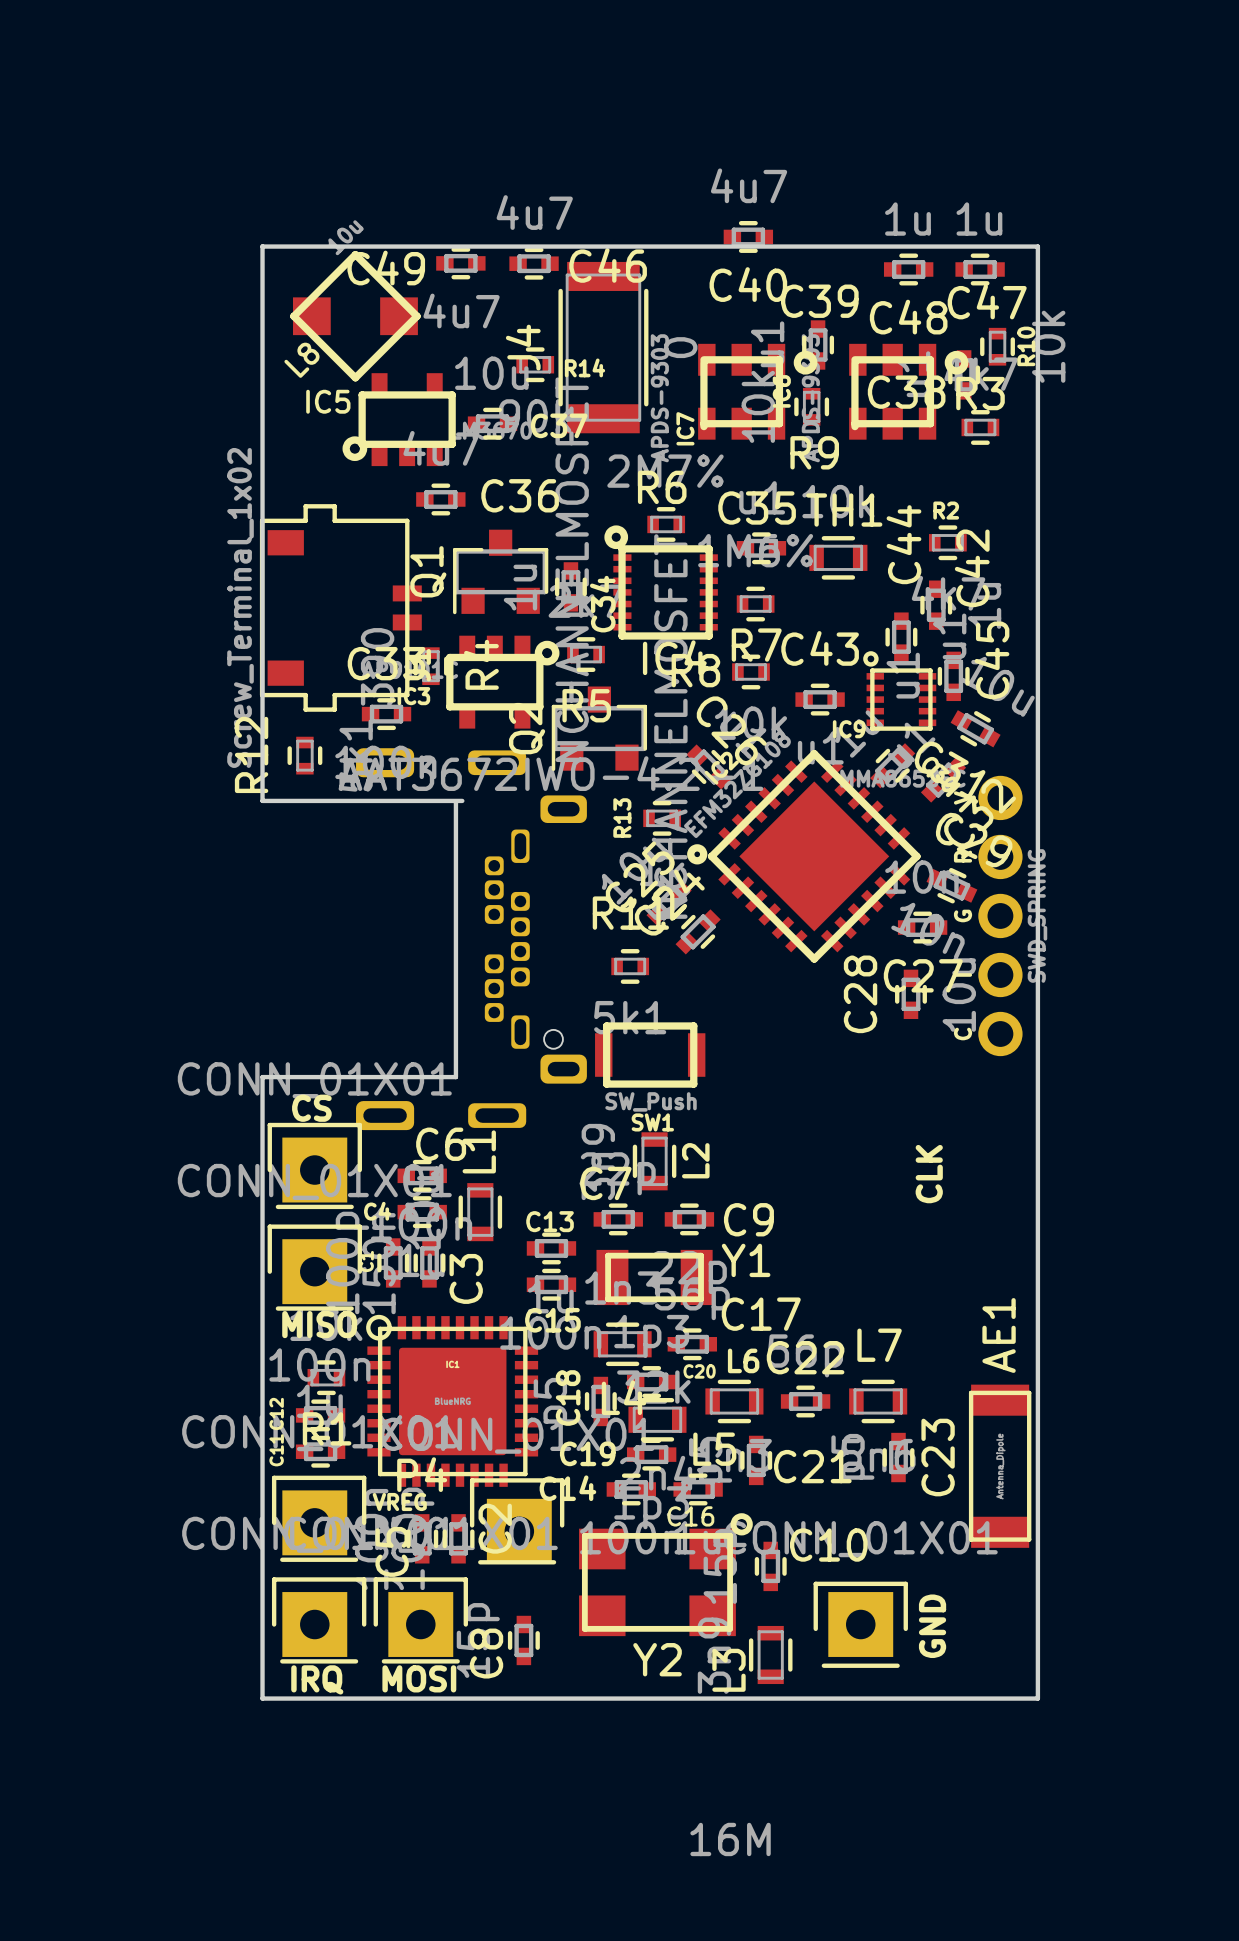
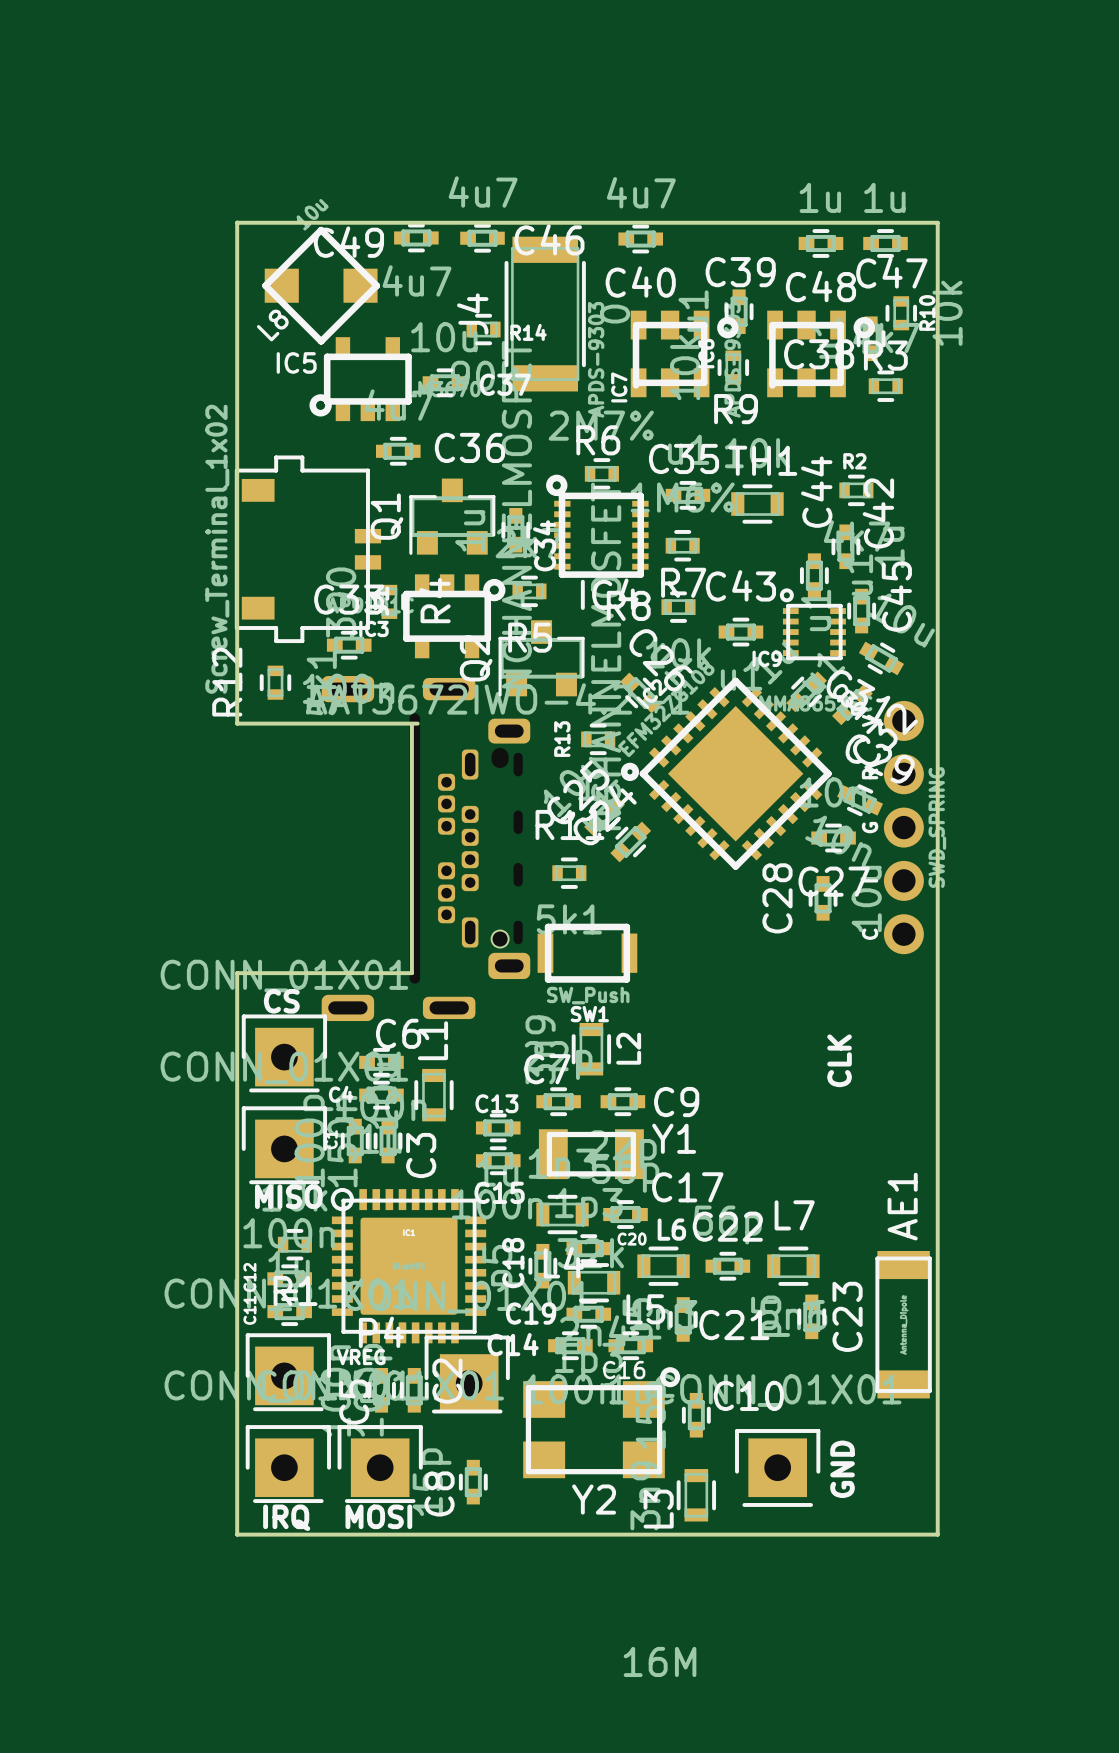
C40 position: (748, 236) -> (640, 239)

